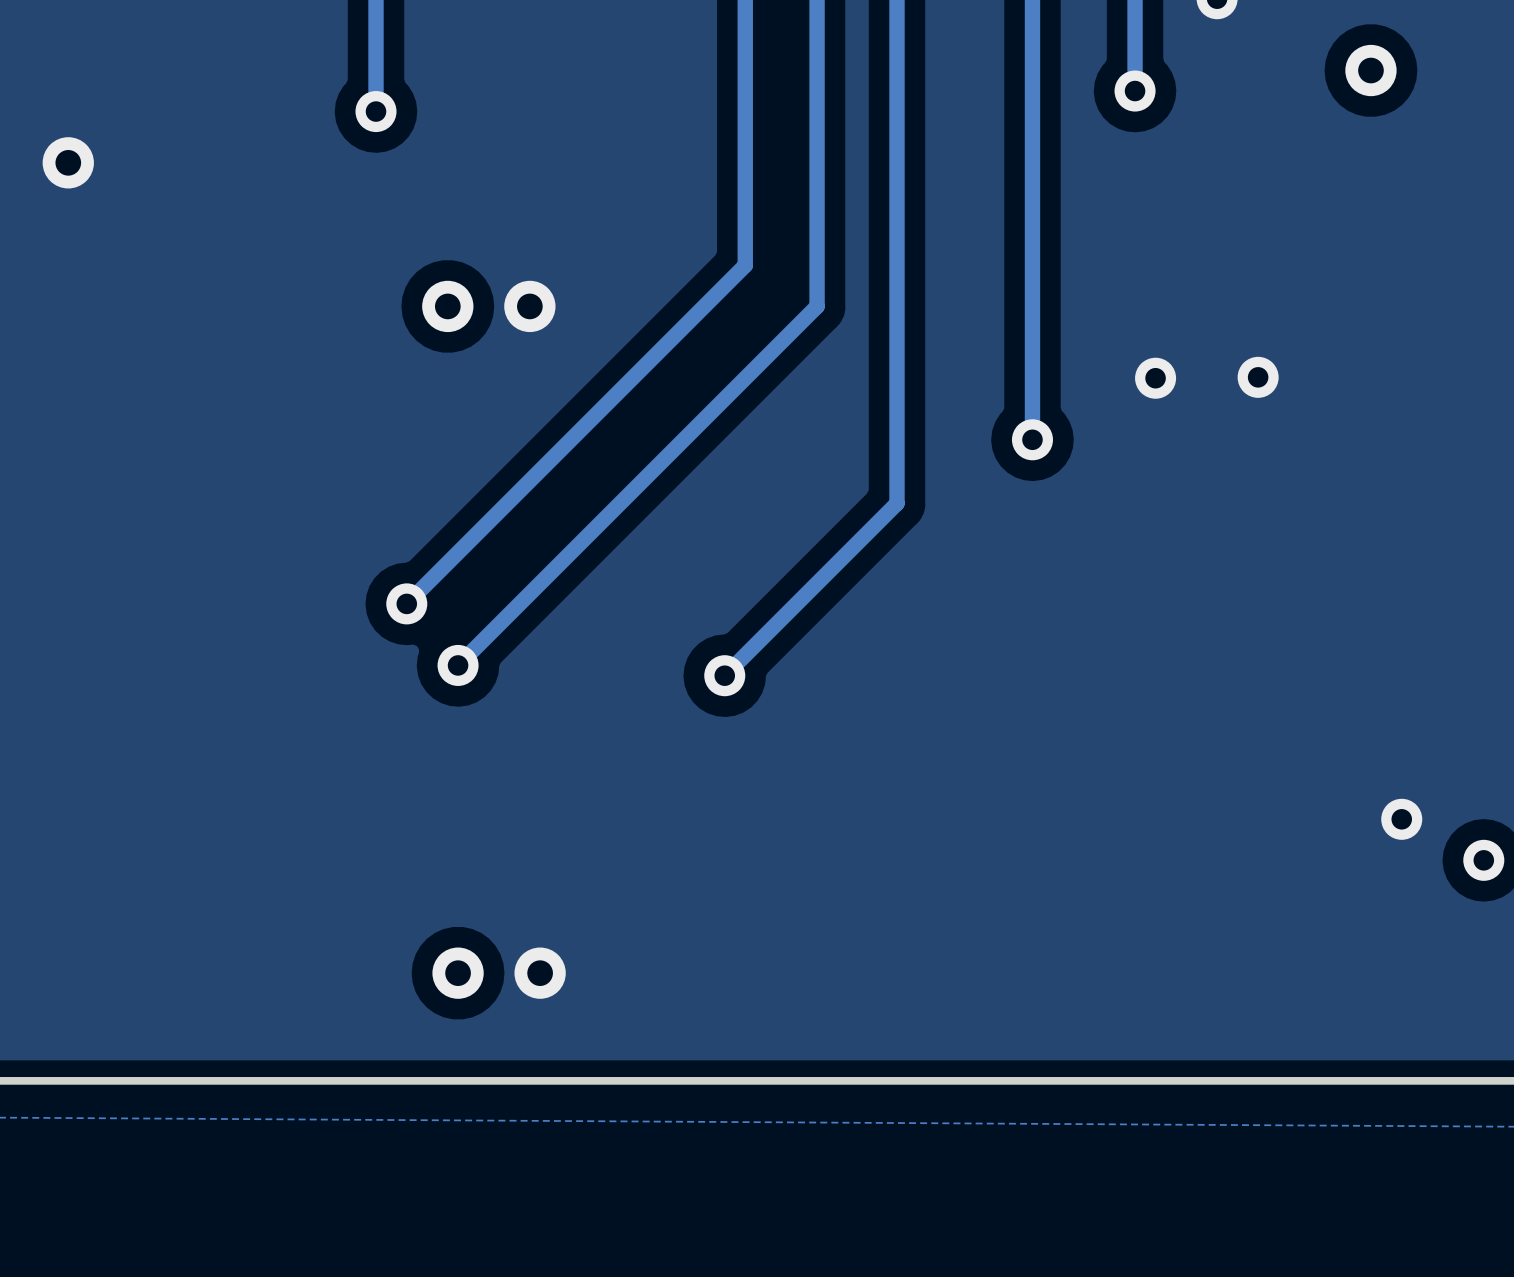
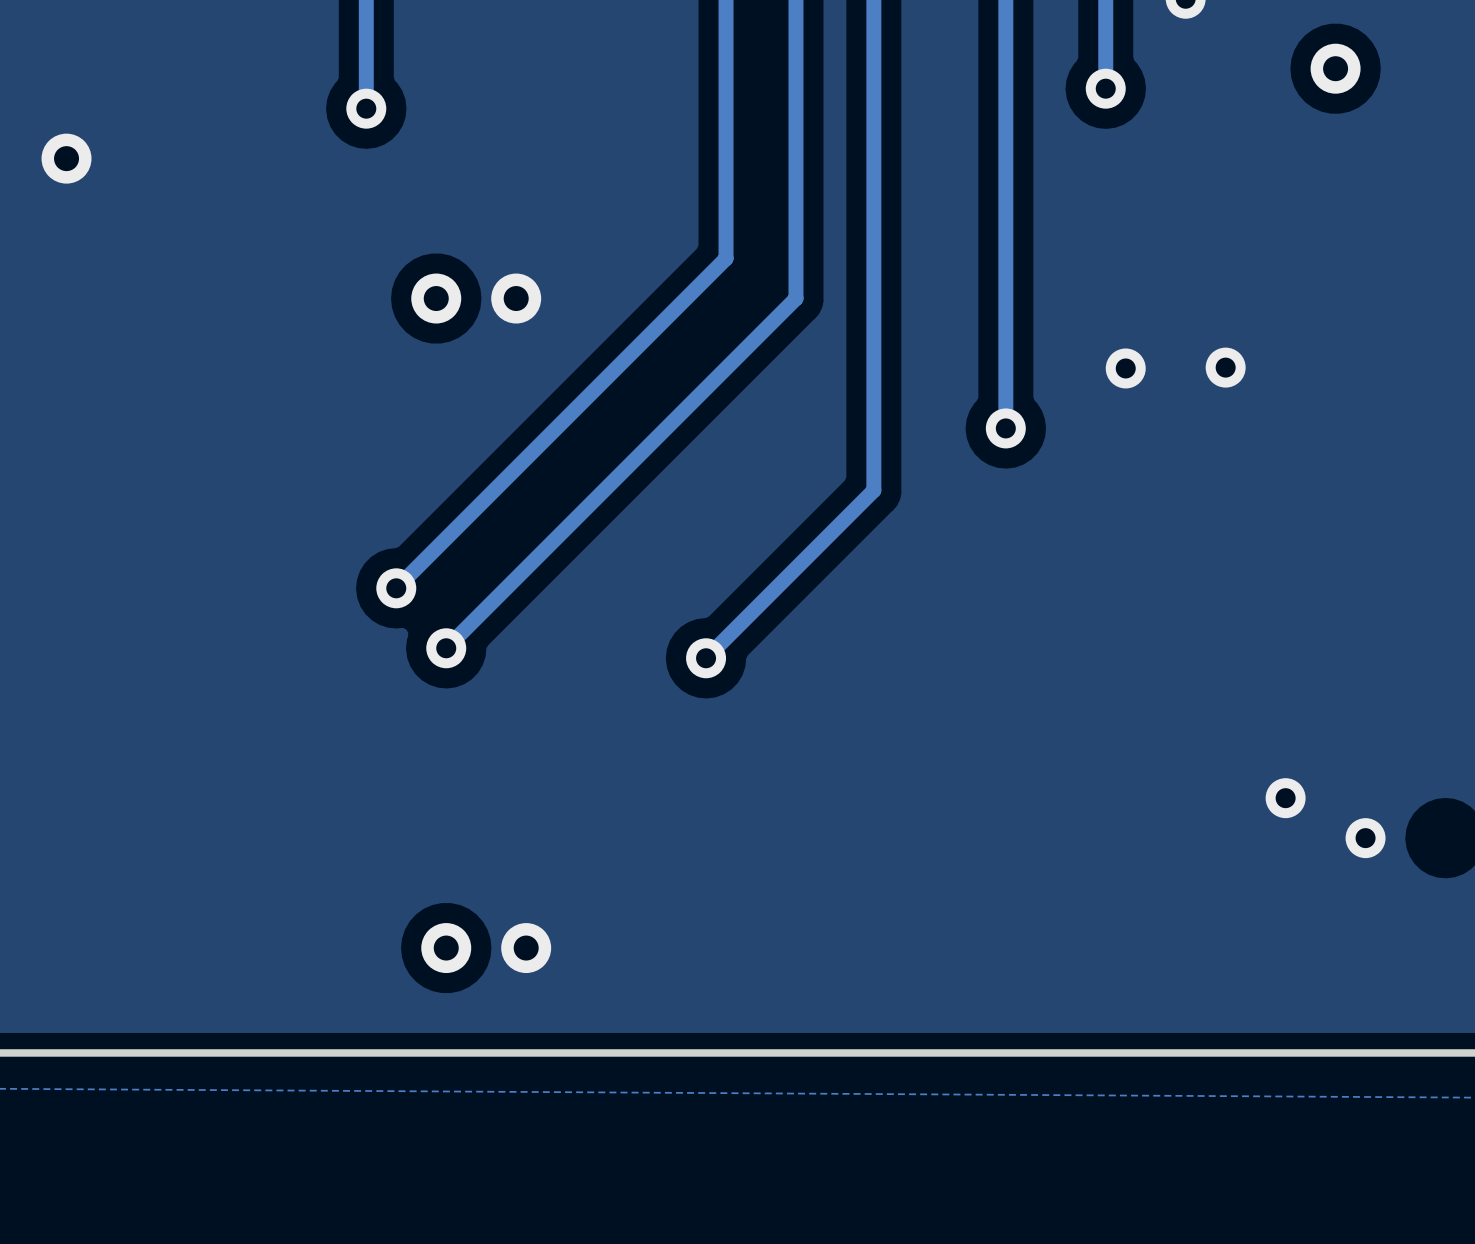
via: none -> (1285, 798)
via position: (1401, 819) -> (1365, 838)
via: (1483, 860) -> none

